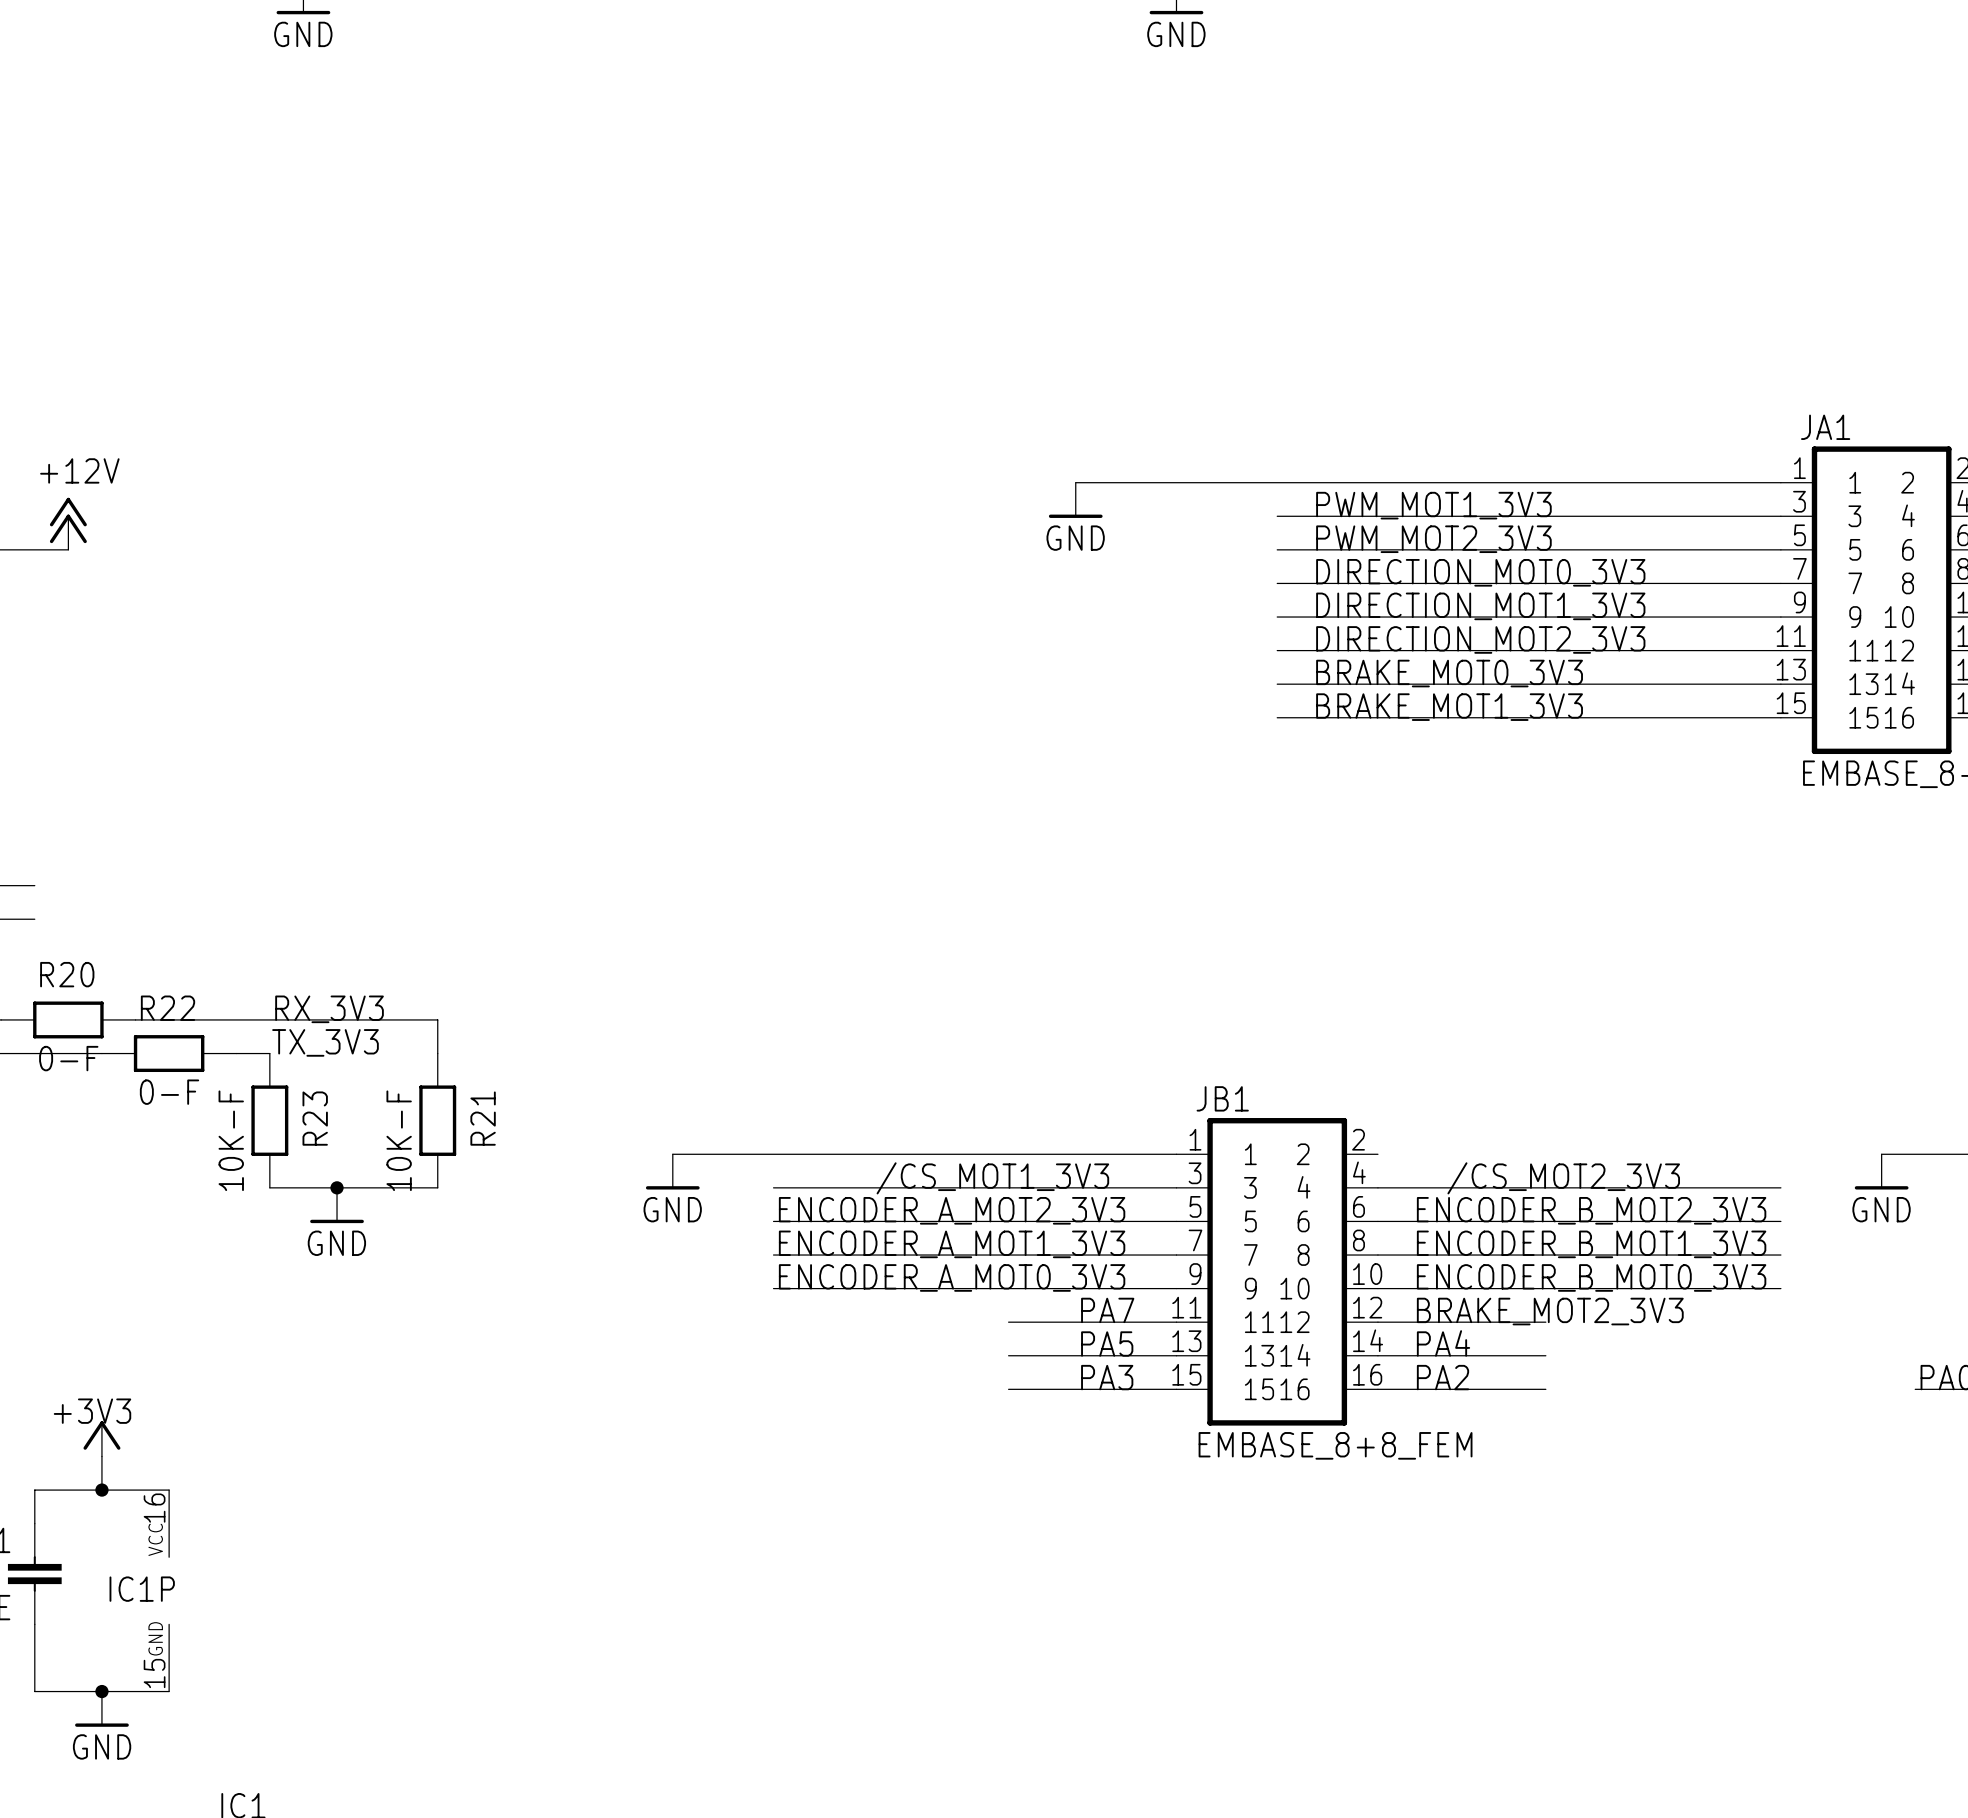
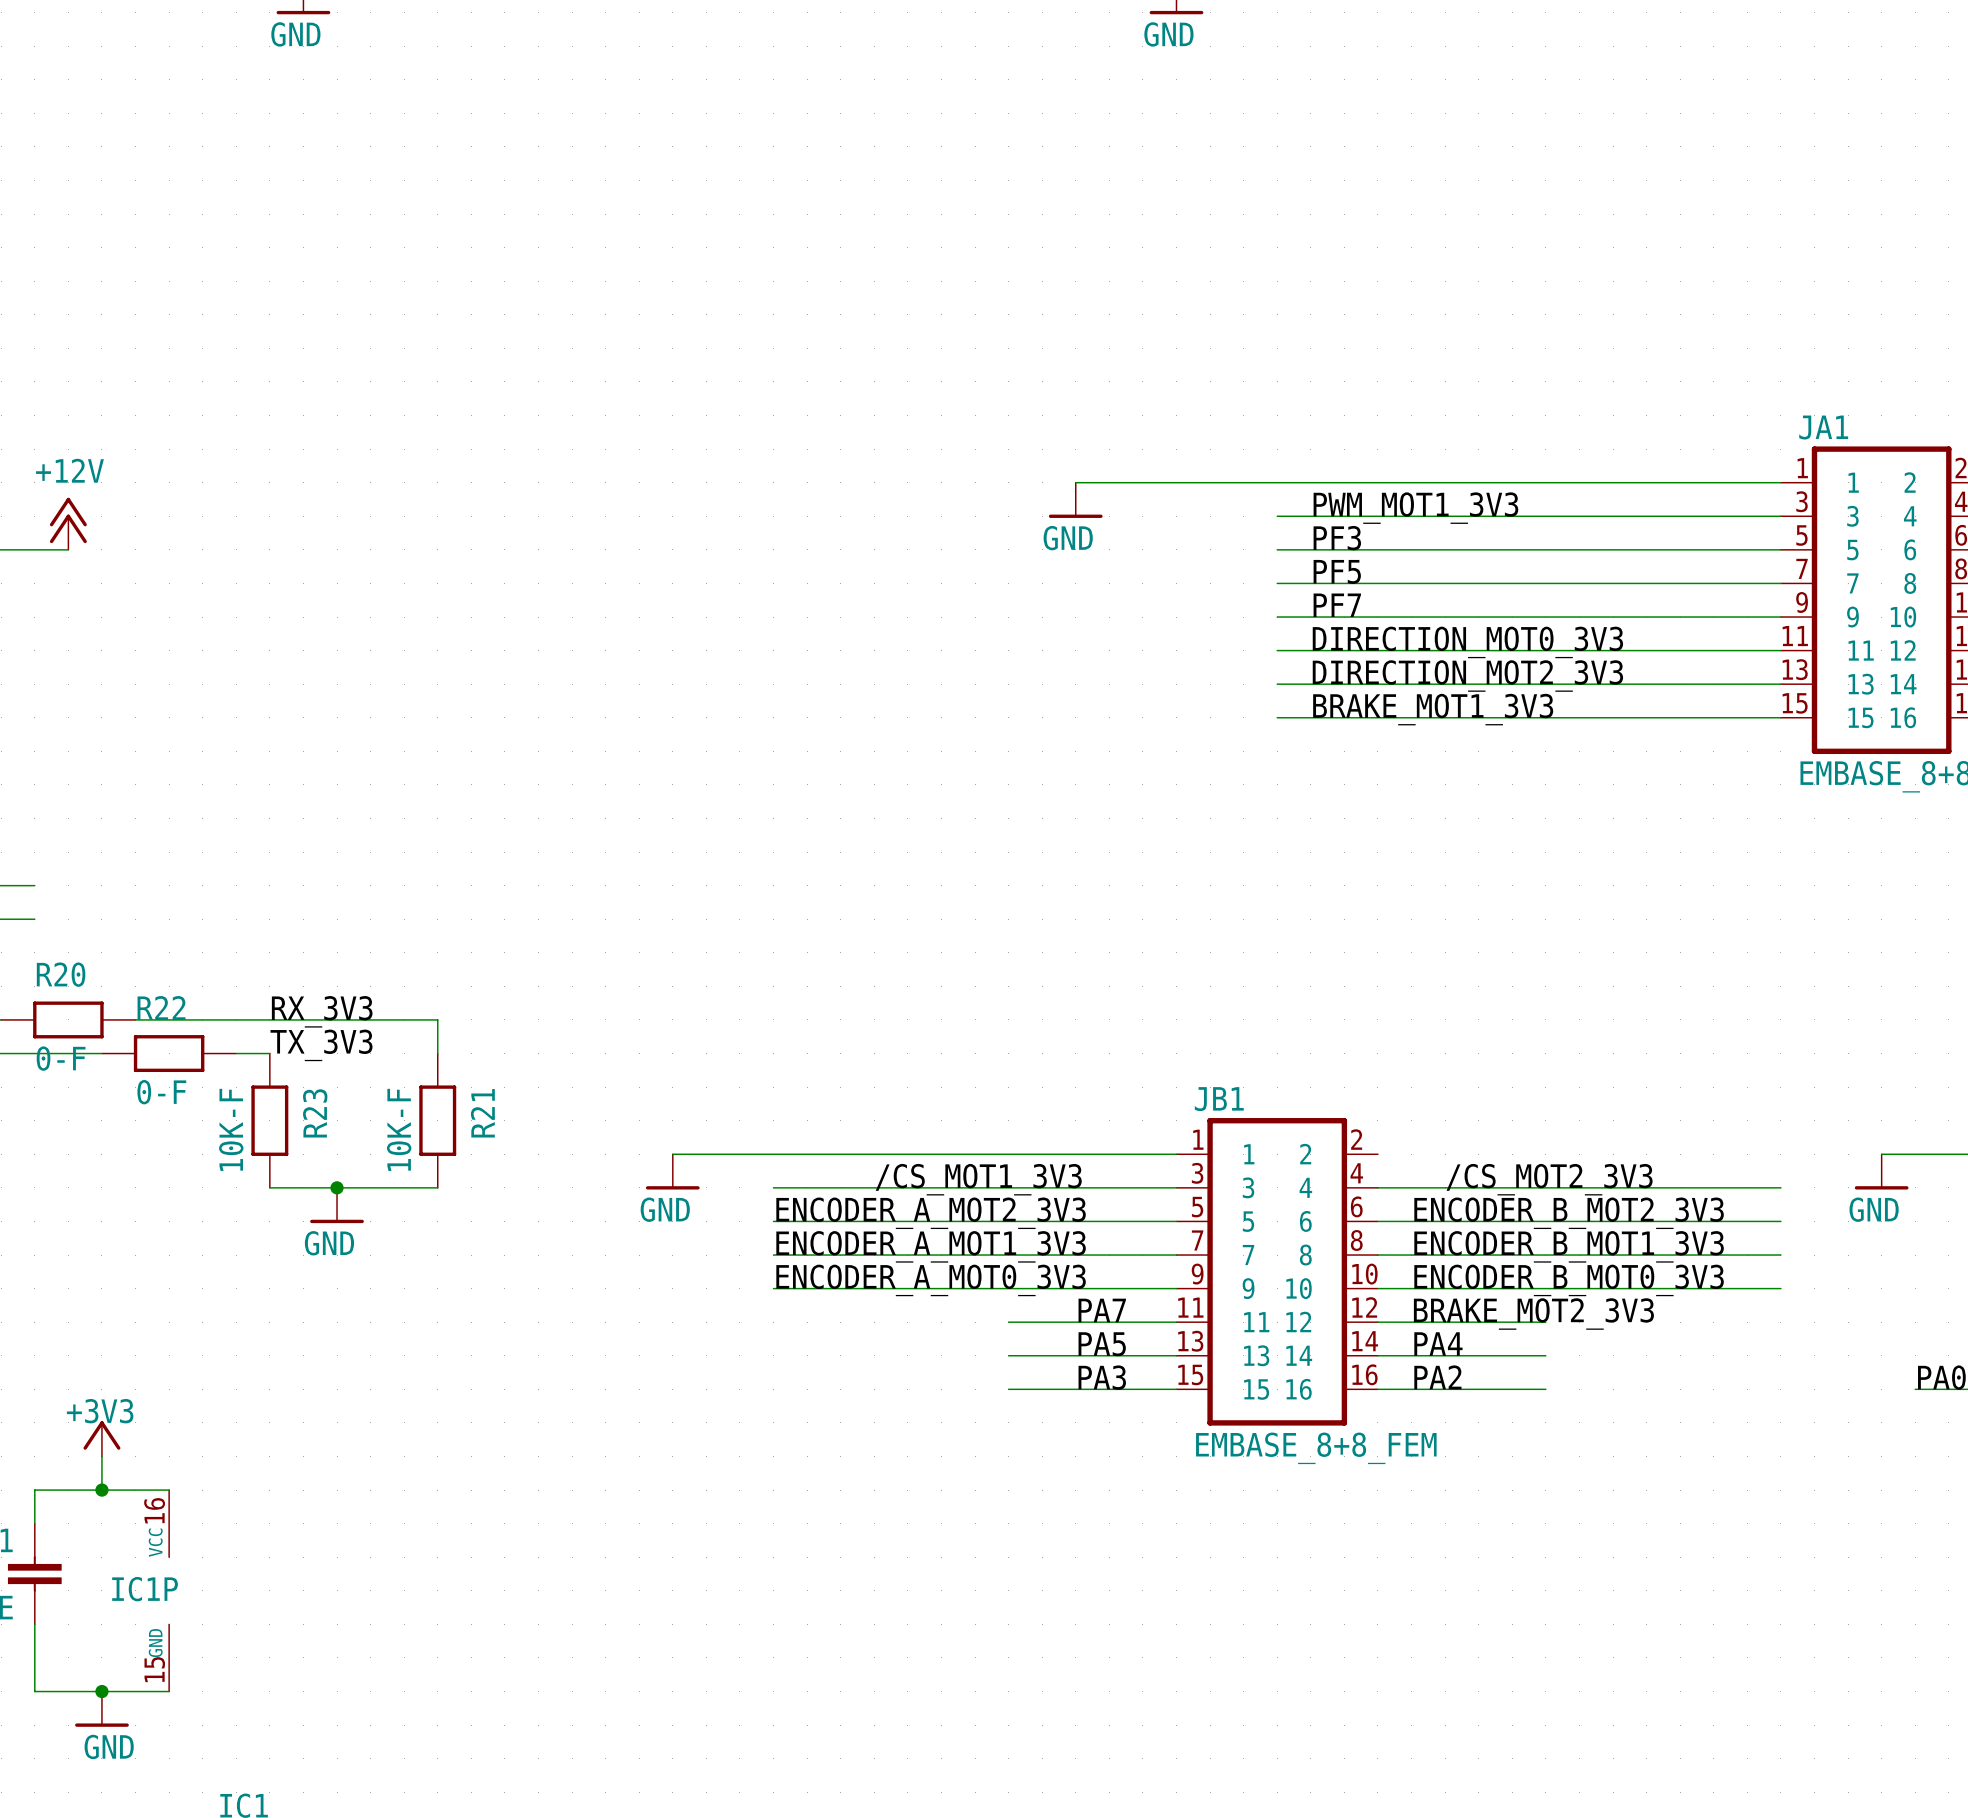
label: PWM_MOT2_3V3 (1433, 539) -> PF3 (1337, 538)
label: DIRECTION_MOT0_3V3 (1480, 572) -> PF5 (1337, 571)
label: DIRECTION_MOT1_3V3 (1480, 606) -> PF7 (1337, 605)
label: DIRECTION_MOT2_3V3 (1480, 639) -> DIRECTION_MOT0_3V3 (1467, 642)
label: BRAKE_MOT0_3V3 (1449, 673) -> DIRECTION_MOT2_3V3 (1467, 676)

